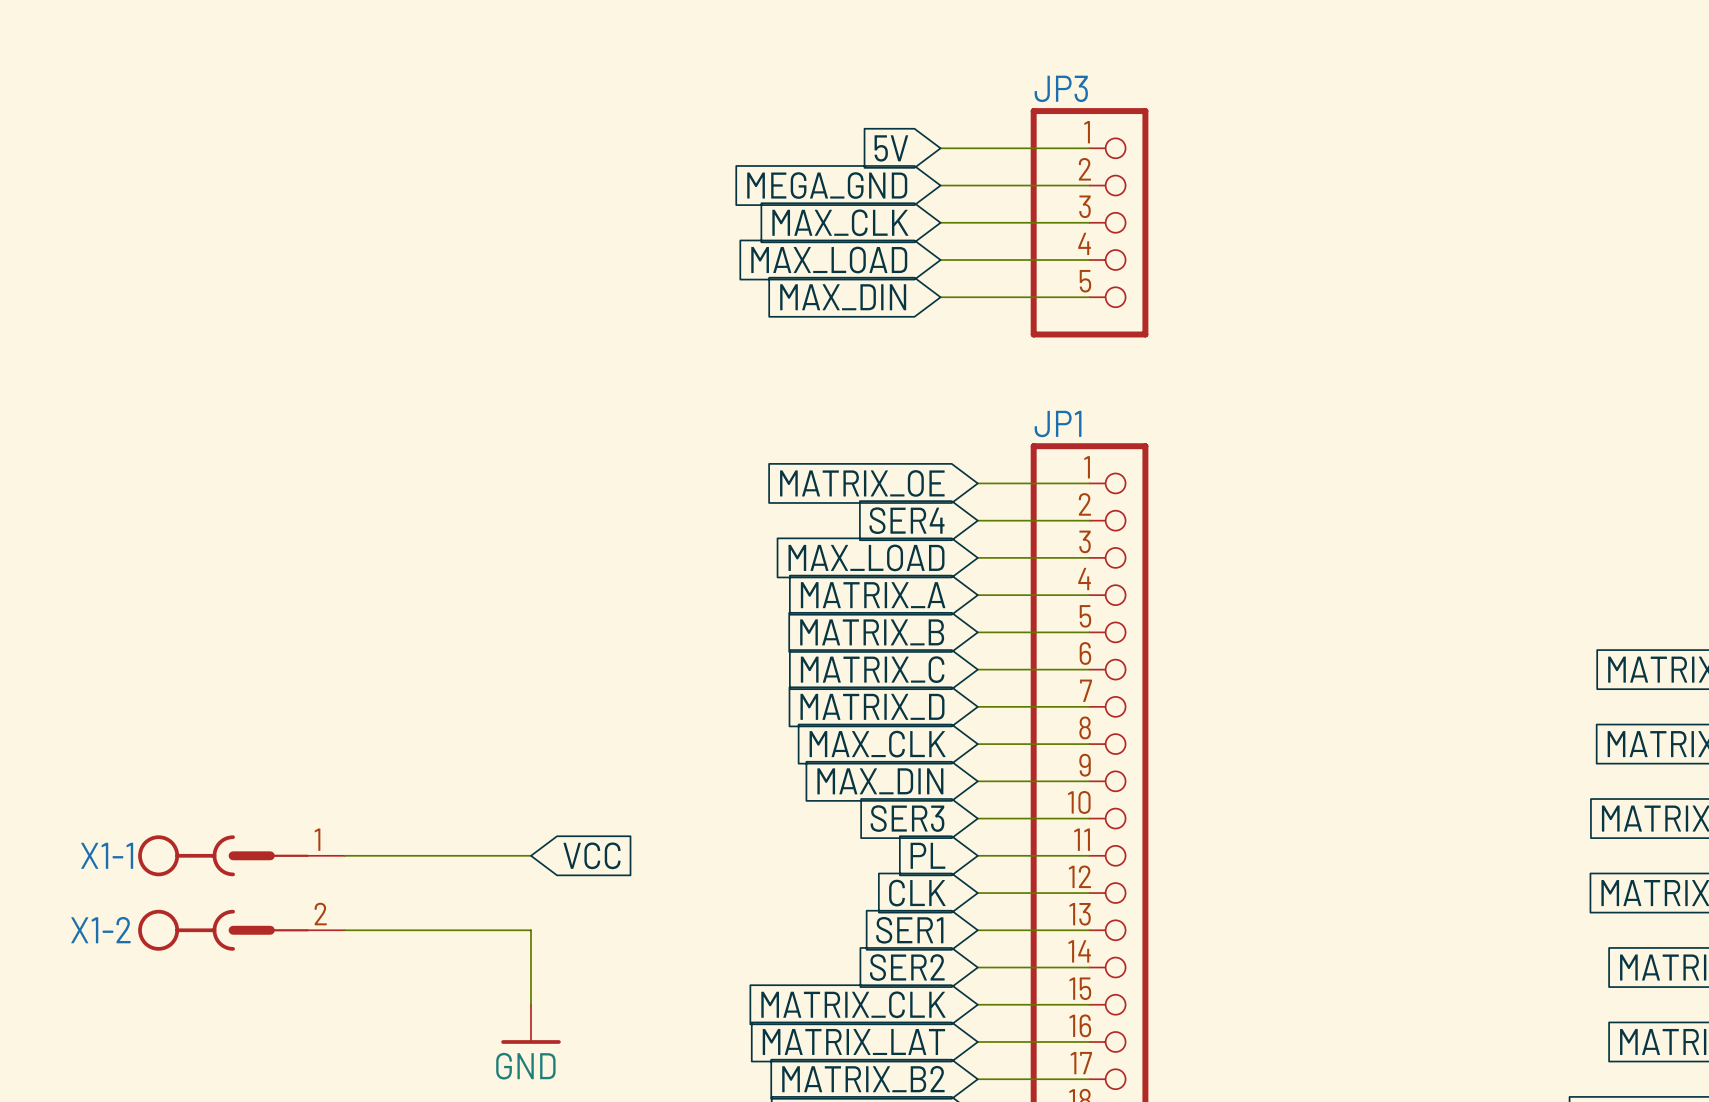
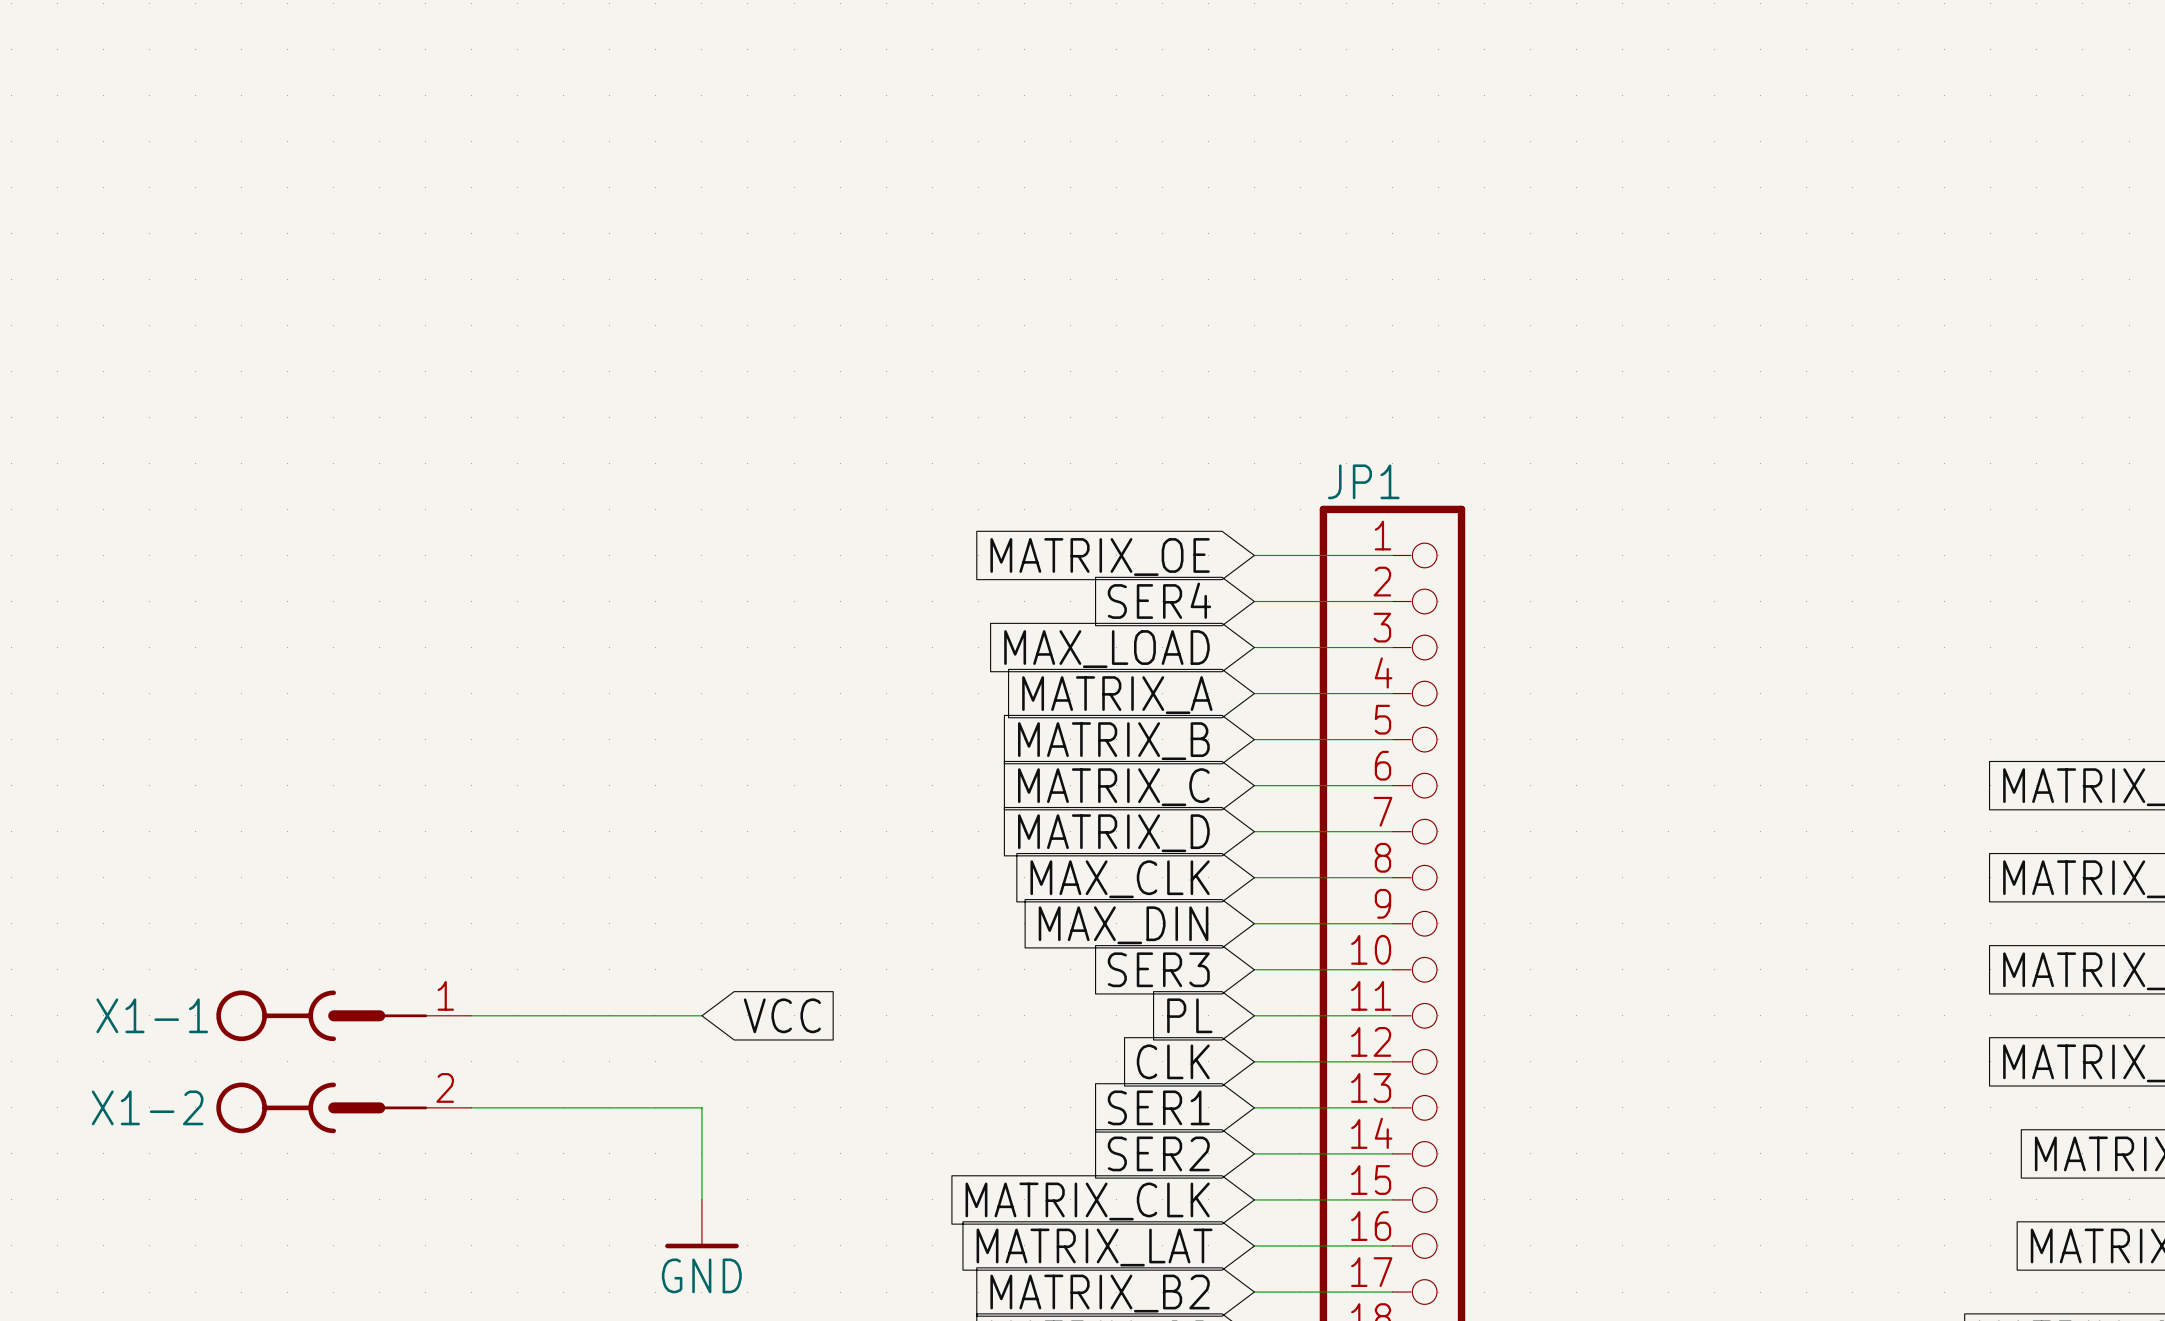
global label: 5V (891, 148) -> none
wire: (940, 148) (1089, 148) -> none
global label: MEGA_GND (827, 185) -> none
wire: (940, 185) (1089, 185) -> none
global label: MAX_CLK (840, 222) -> none
wire: (940, 222) (1089, 222) -> none
JP3: (1089, 222) -> none
global label: MAX_LOAD (829, 260) -> none
wire: (940, 260) (1089, 260) -> none
global label: MAX_DIN (843, 297) -> none
wire: (940, 297) (1089, 297) -> none

